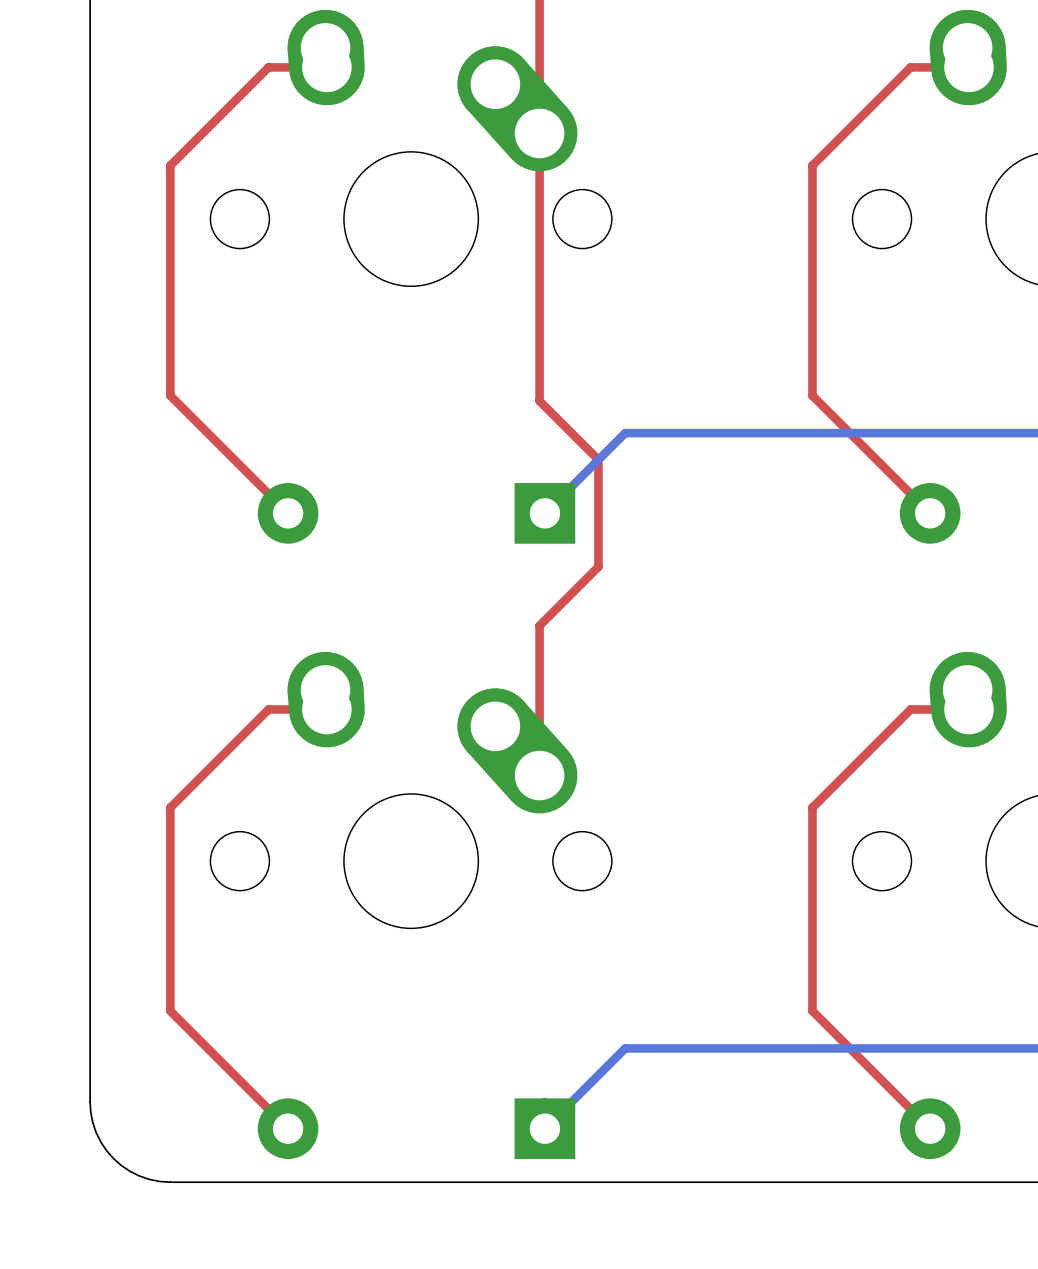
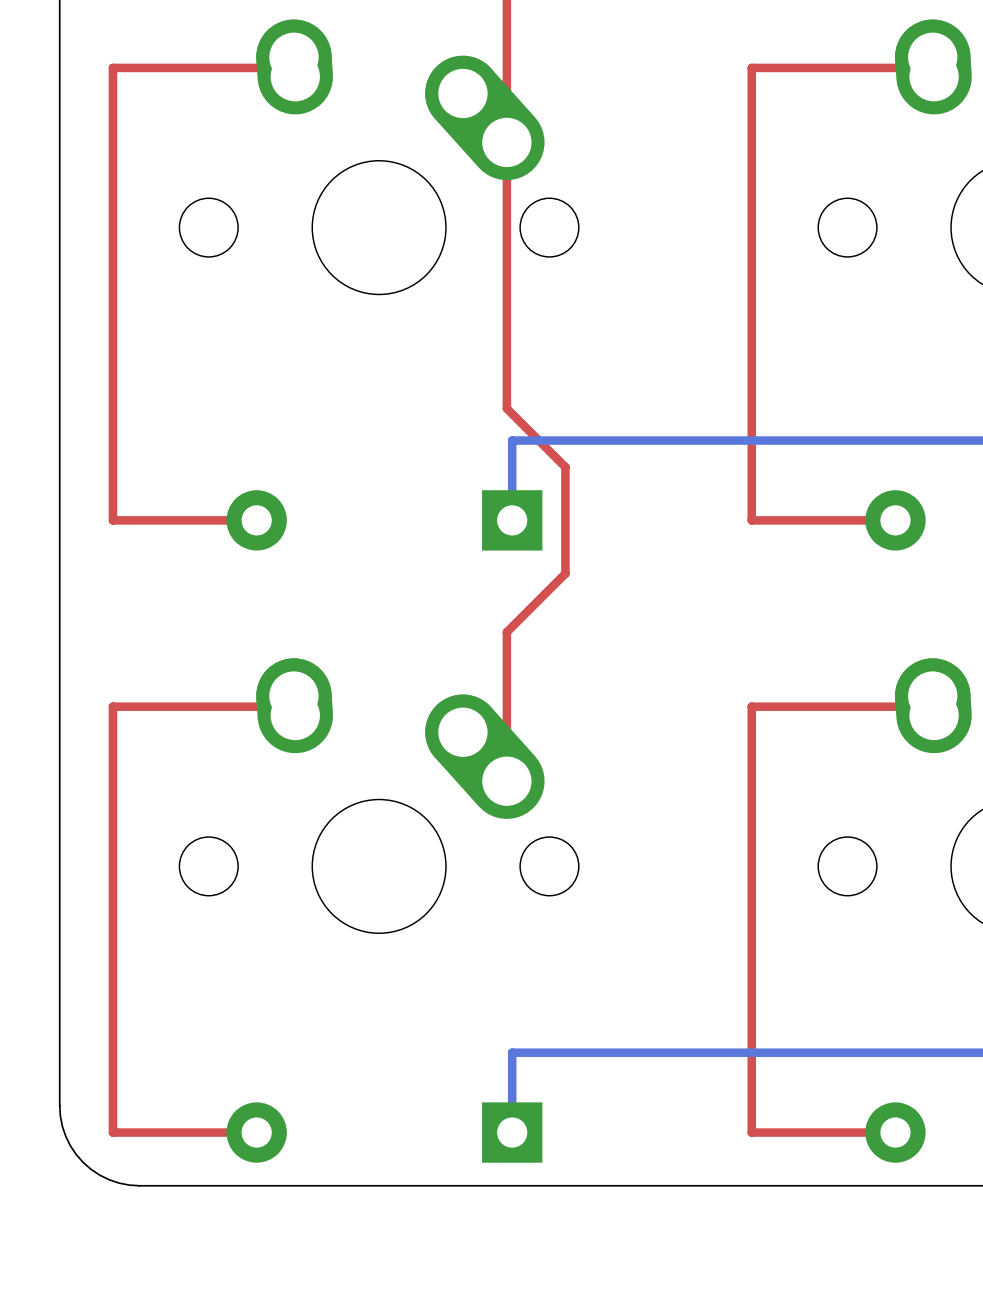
top track: (326, 67) (268, 67) (170, 165) (170, 395) (288, 513) -> (286, 67) (112, 67) (112, 520) (256, 520)
top track: (968, 67) (910, 67) (812, 165) (812, 395) (930, 513) -> (925, 67) (751, 67) (751, 520) (895, 520)
bottom track: (625, 433) (544, 513) -> (592, 440) (512, 440) (512, 520)
top track: (326, 709) (268, 709) (170, 807) (170, 1010) (288, 1128) -> (283, 706) (112, 706) (112, 1132) (256, 1132)
top track: (968, 709) (910, 709) (812, 807) (812, 1010) (930, 1128) -> (925, 706) (751, 706) (751, 1132) (895, 1132)
bottom track: (625, 1048) (544, 1128) -> (592, 1052) (512, 1052) (512, 1105)

